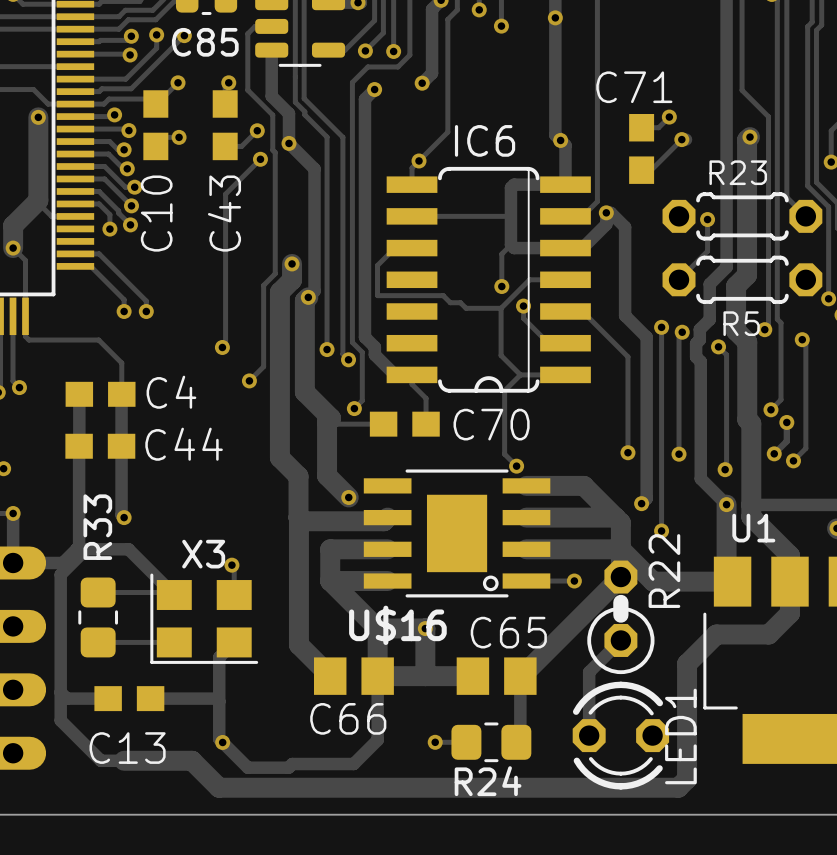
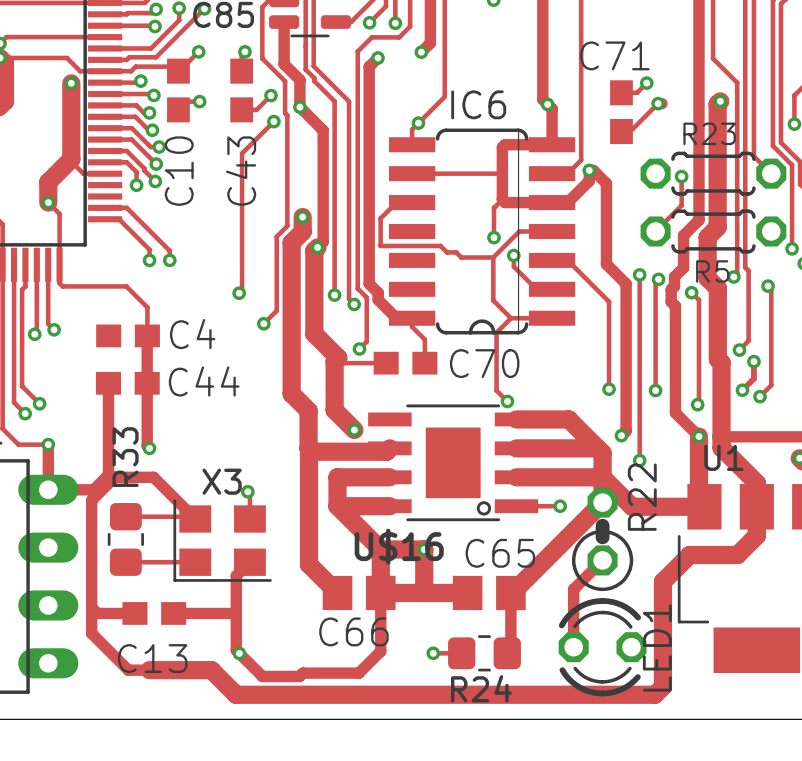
track: (79, 394) (79, 446) -> none

